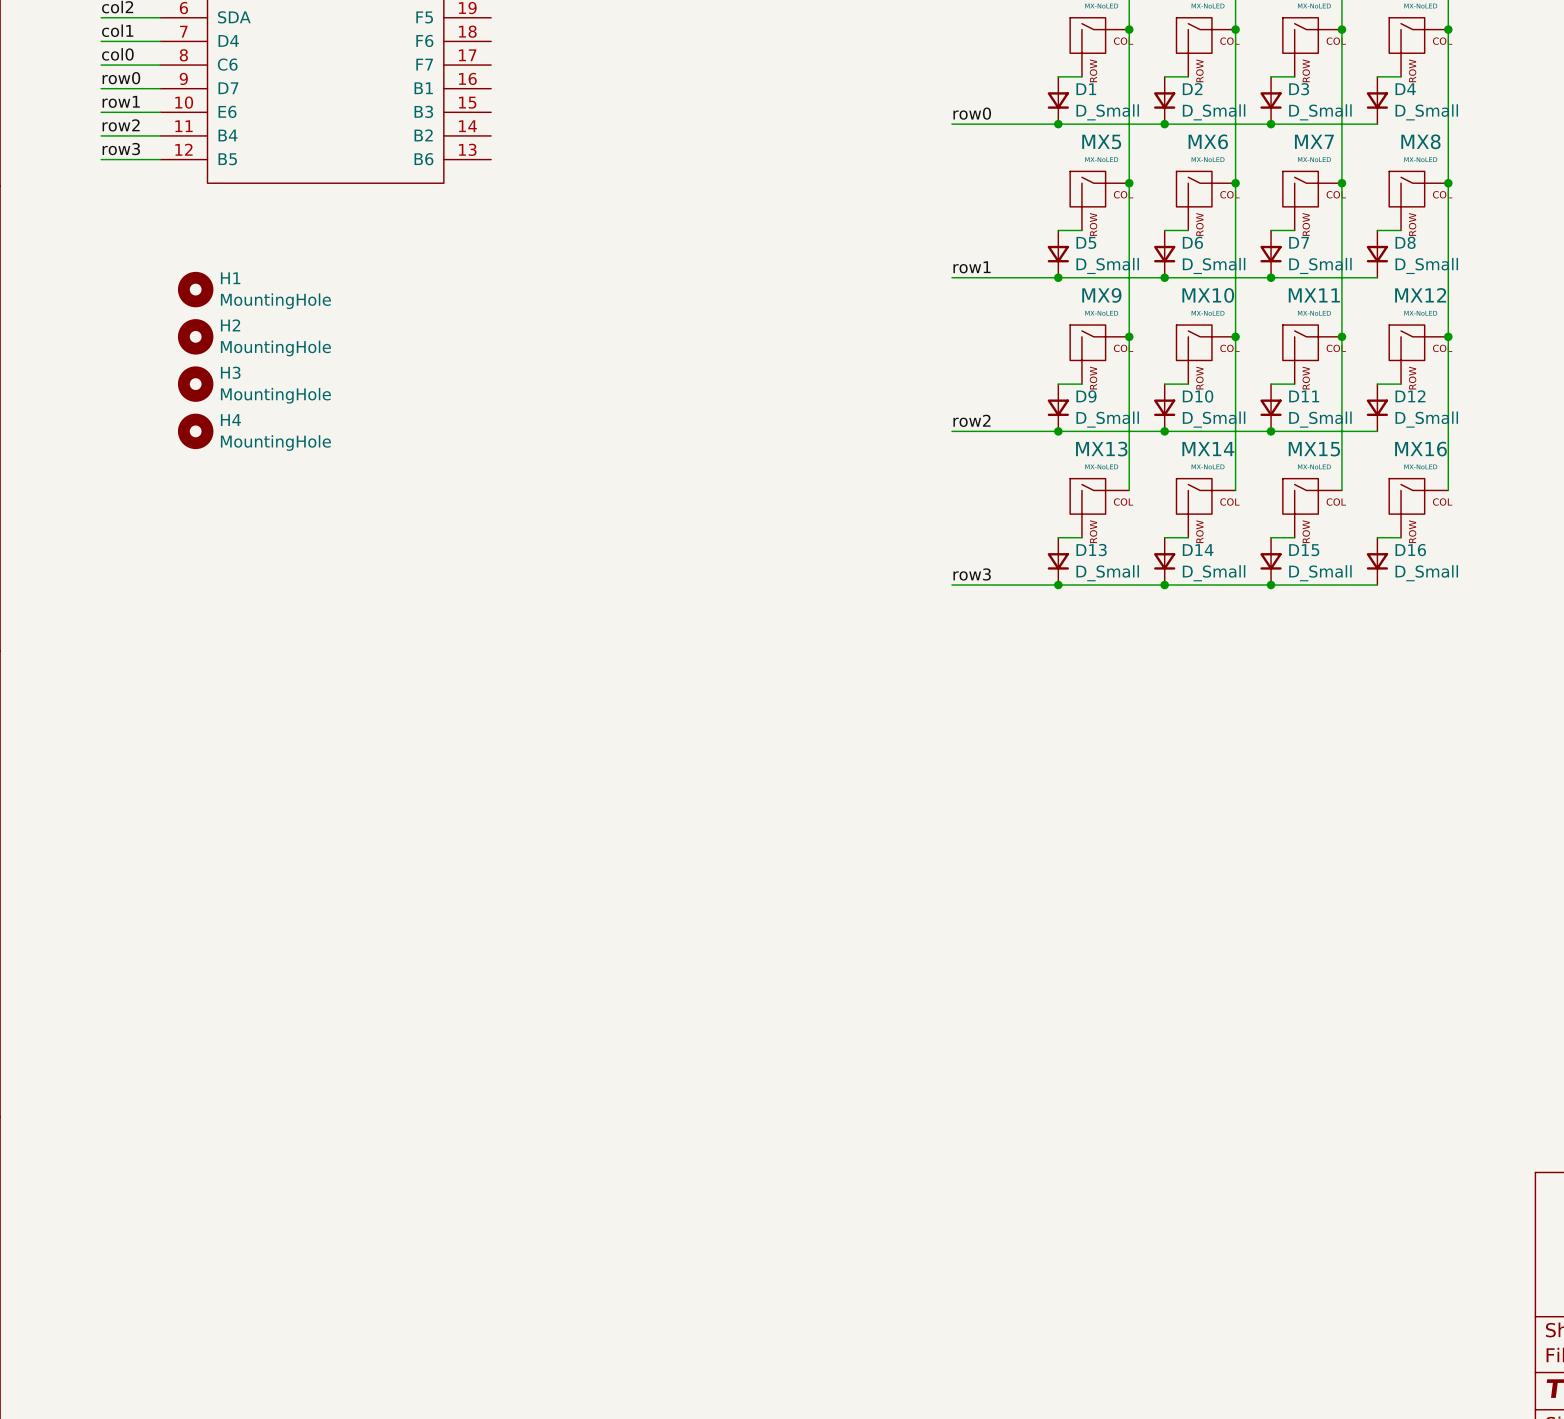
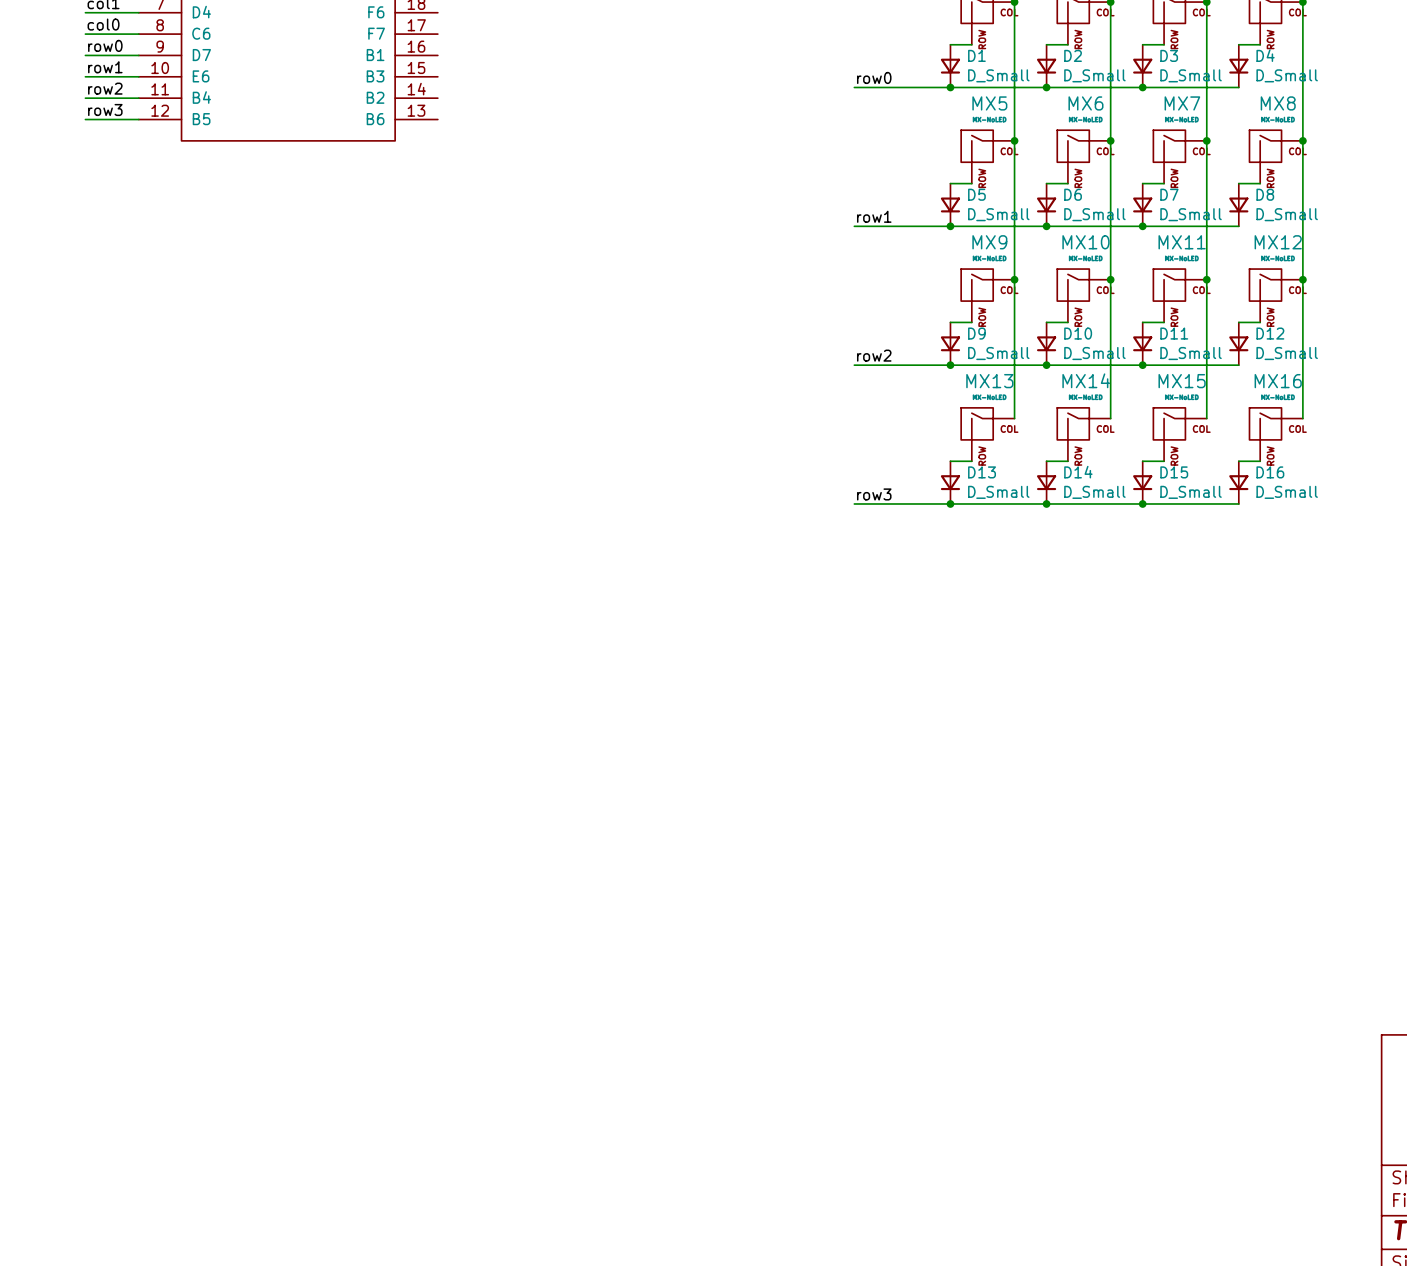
H1: MountingHole (195, 289) -> none
H2: MountingHole (195, 336) -> none
H3: MountingHole (195, 384) -> none
H4: MountingHole (195, 431) -> none

